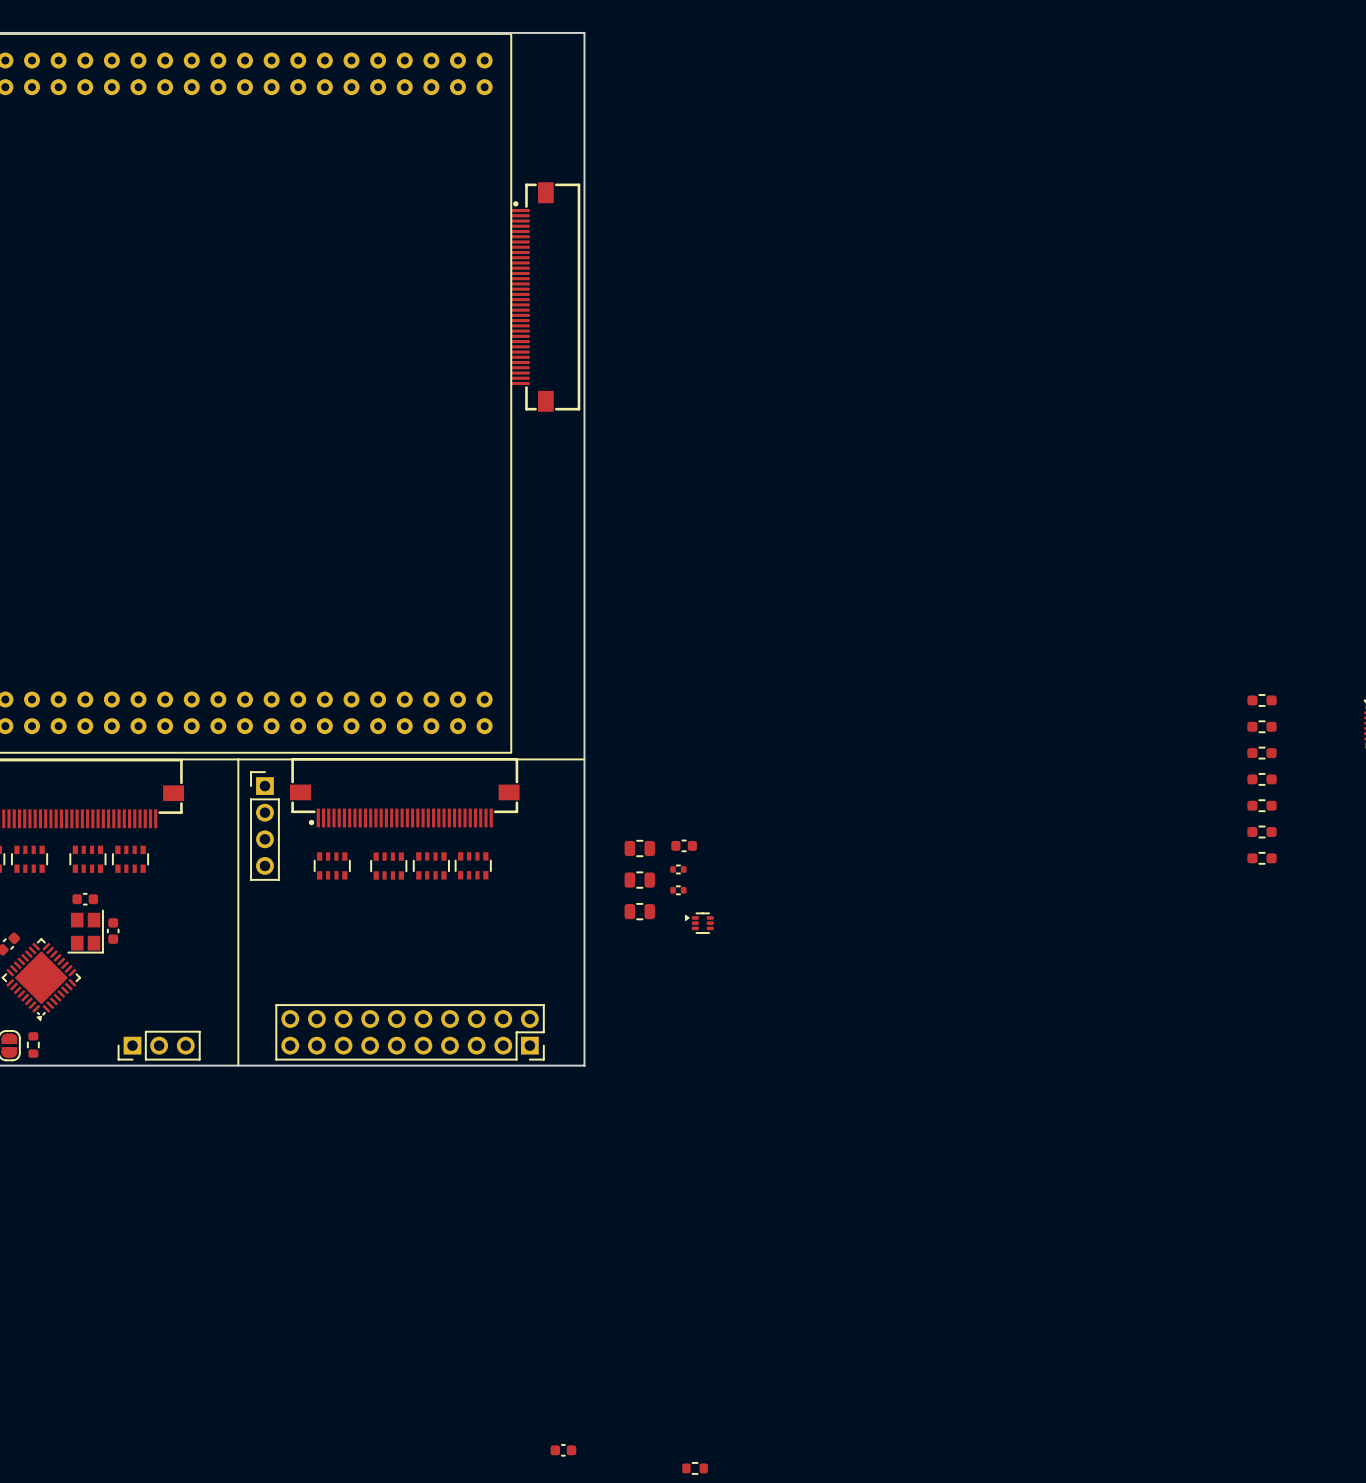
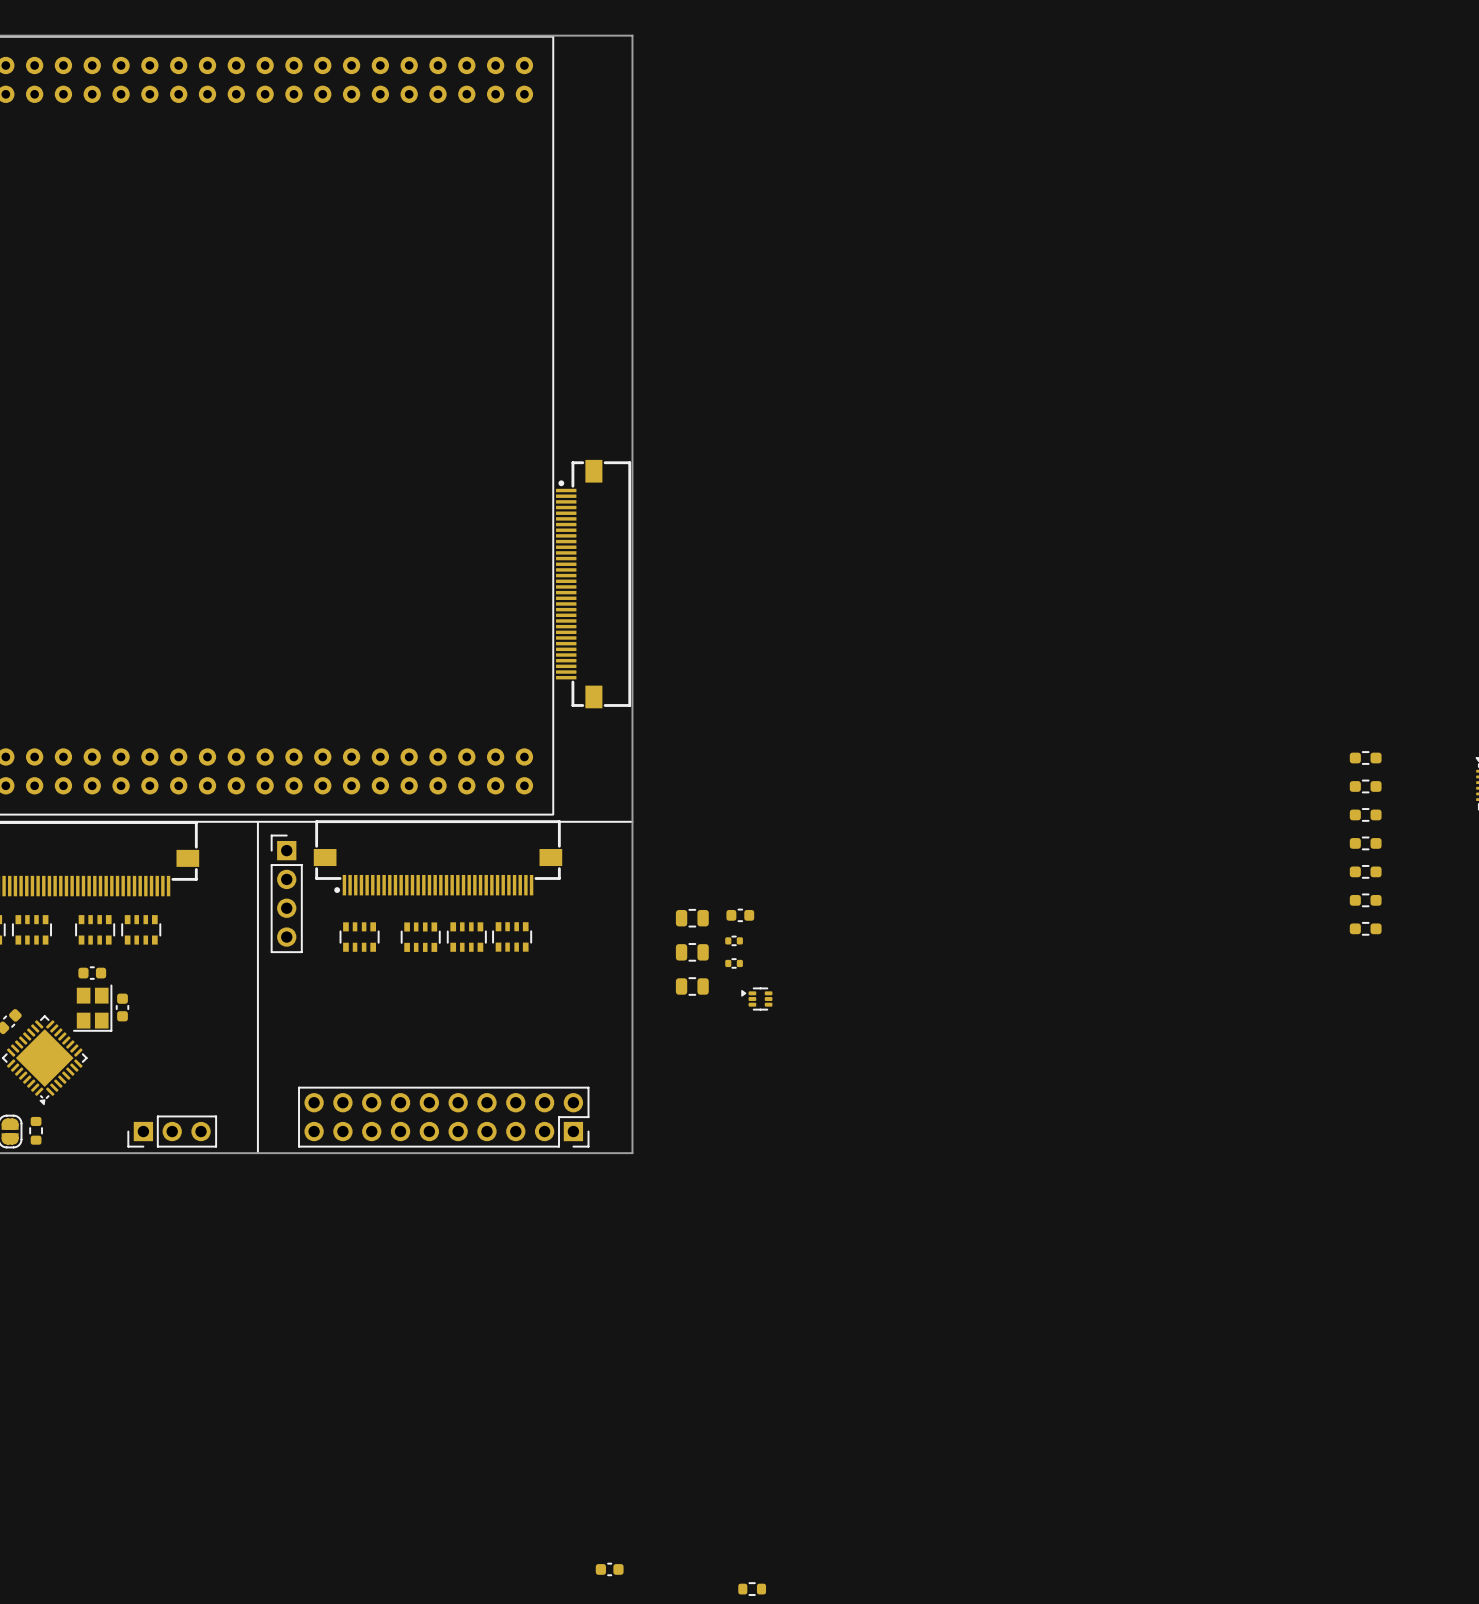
part position: (545, 297) -> (593, 584)

